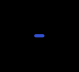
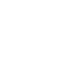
bottom track: (35, 35) (42, 35) -> none

